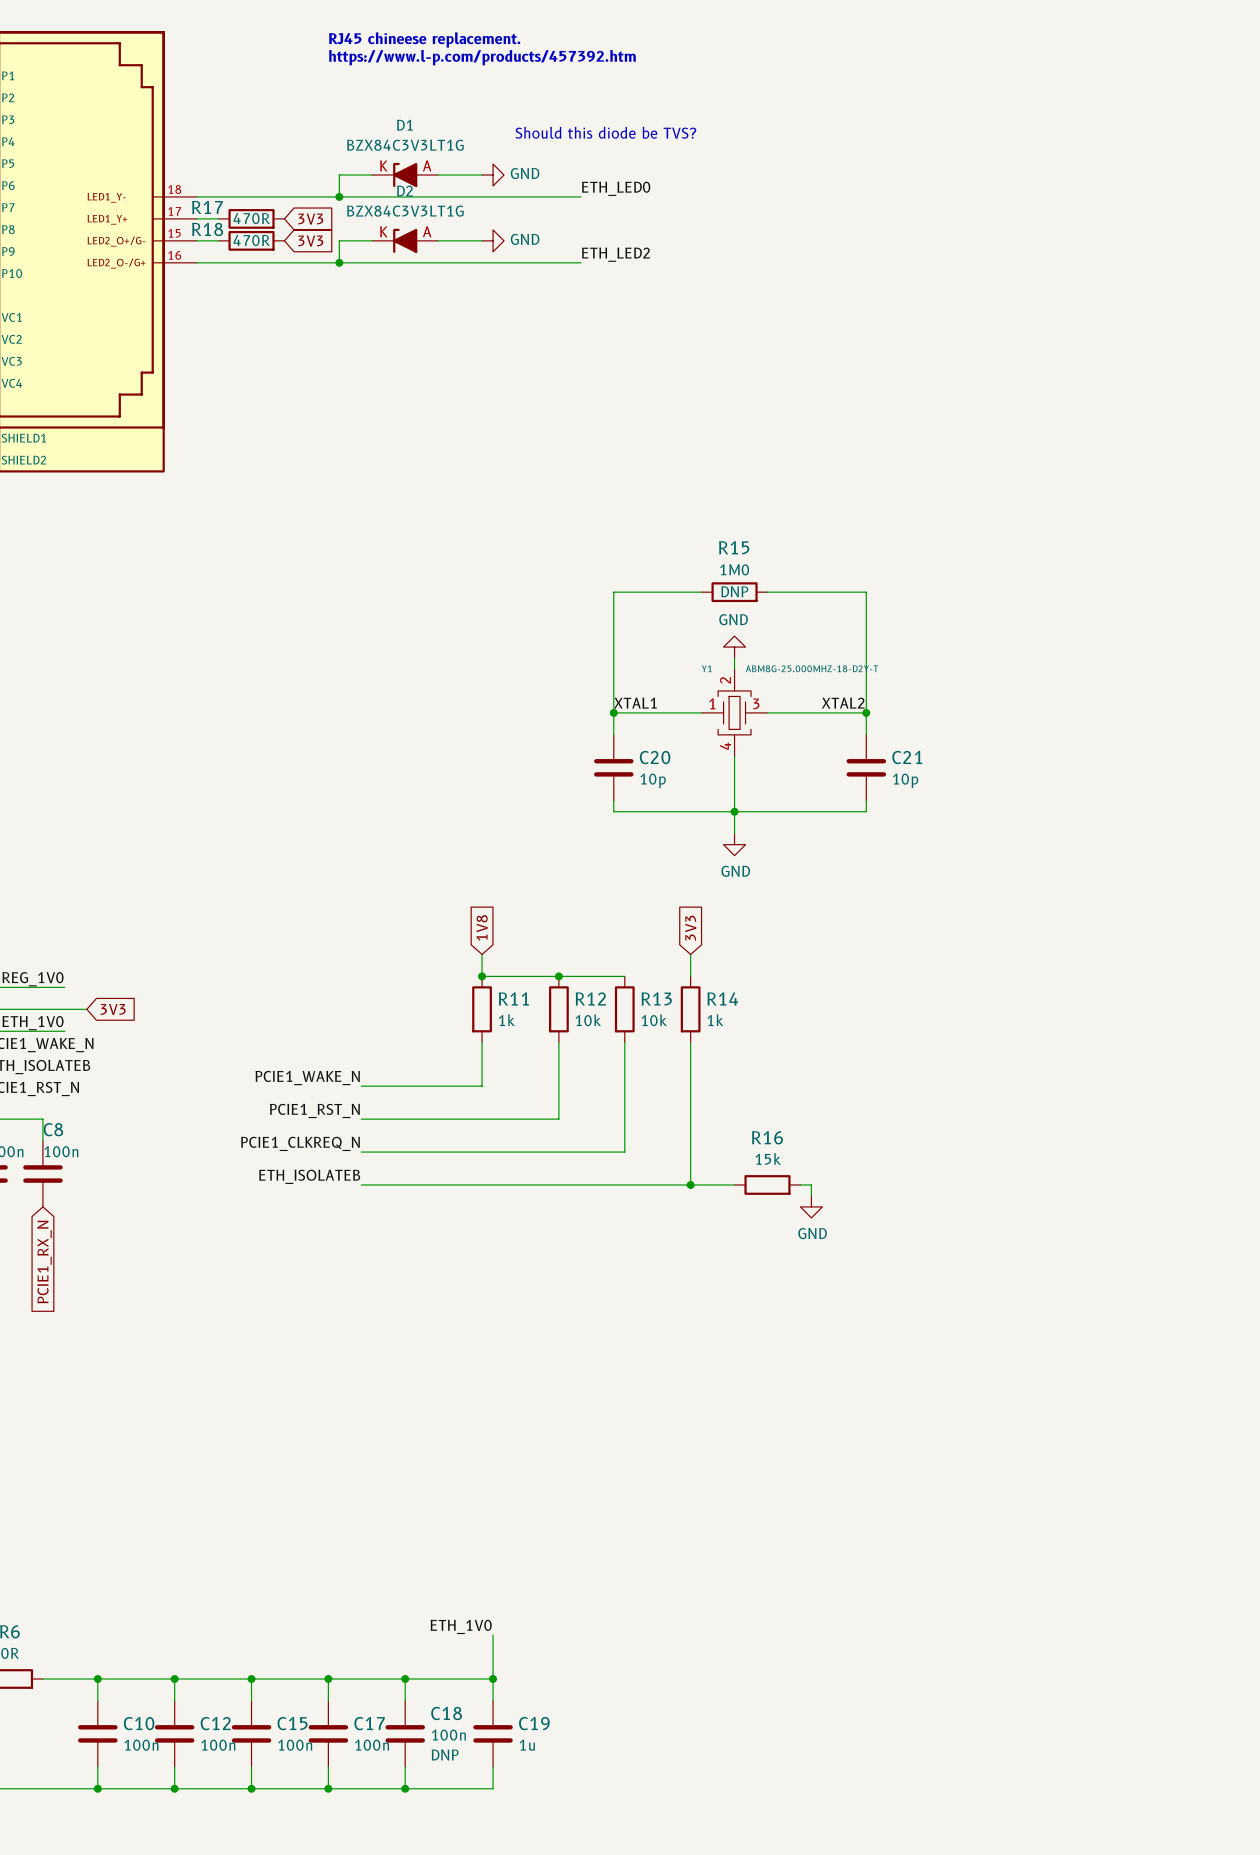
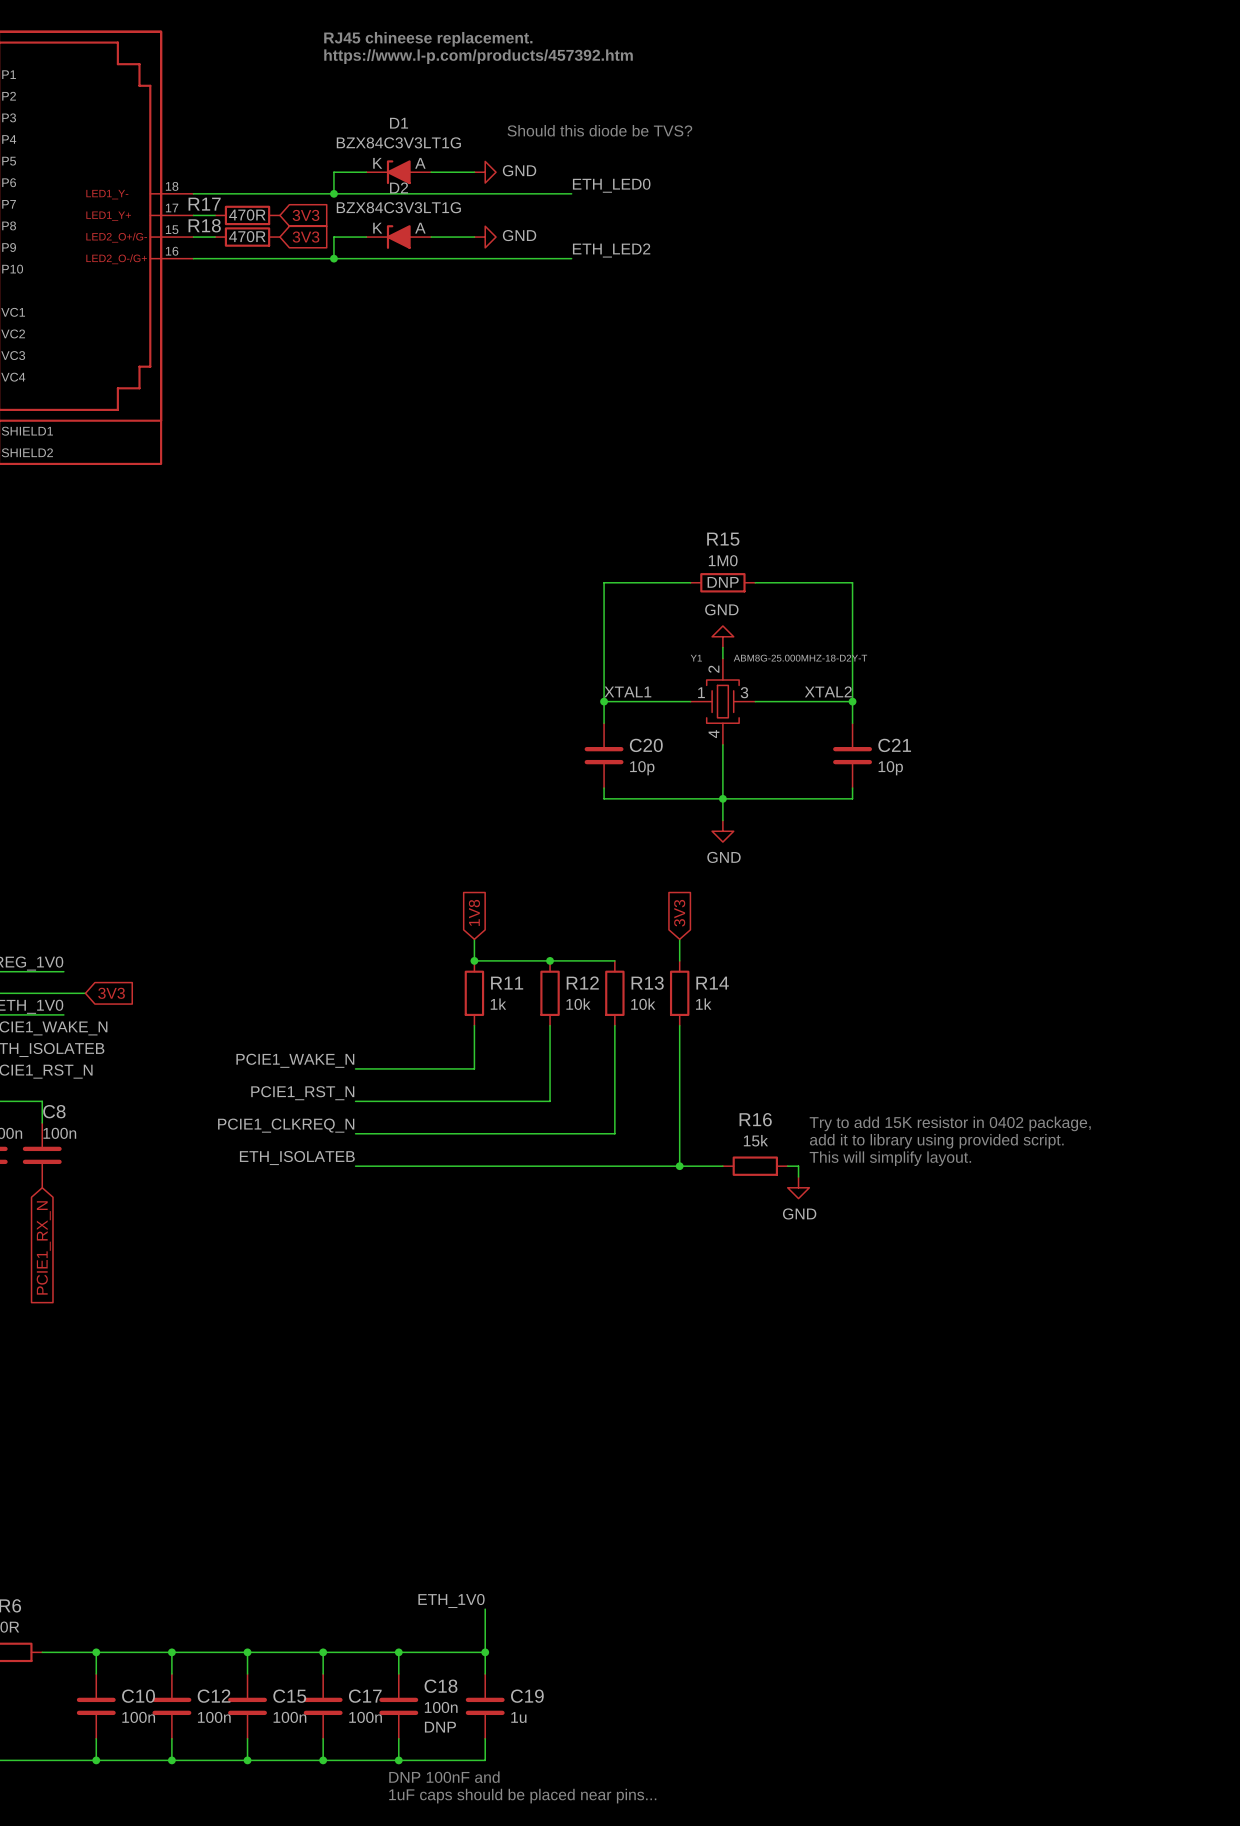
text: none -> Try to add 15K resistor in 0402 package, (950, 1123)
text: none -> add it to library using provided script. (936, 1141)
text: none -> This will simplify layout. (890, 1158)
text: none -> DNP 100nF and (444, 1777)
text: none -> 1uF caps should be placed near pins... (522, 1796)

